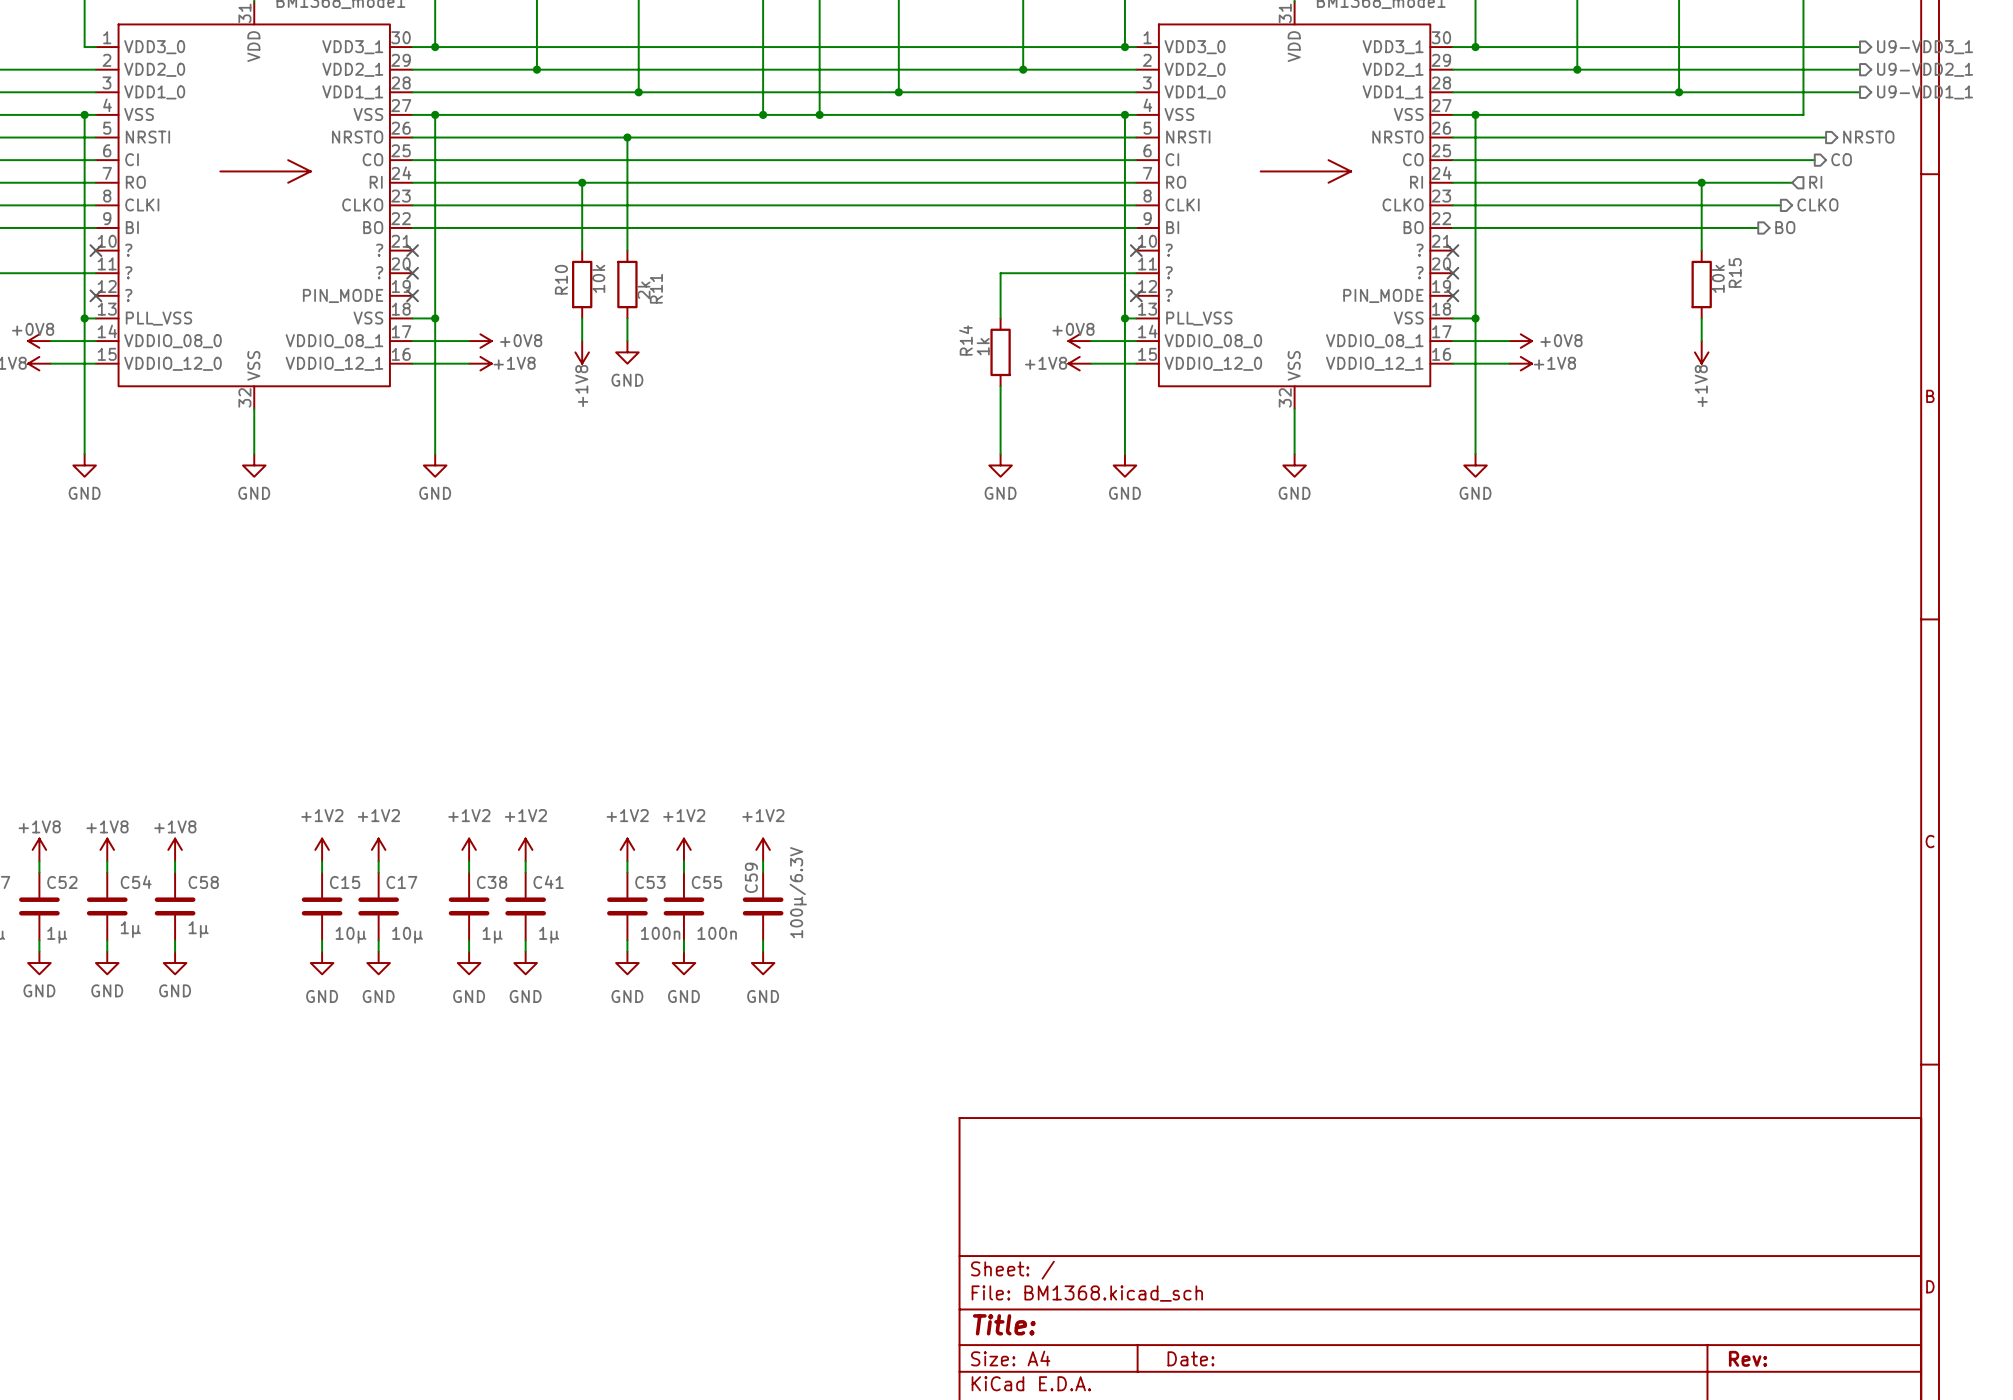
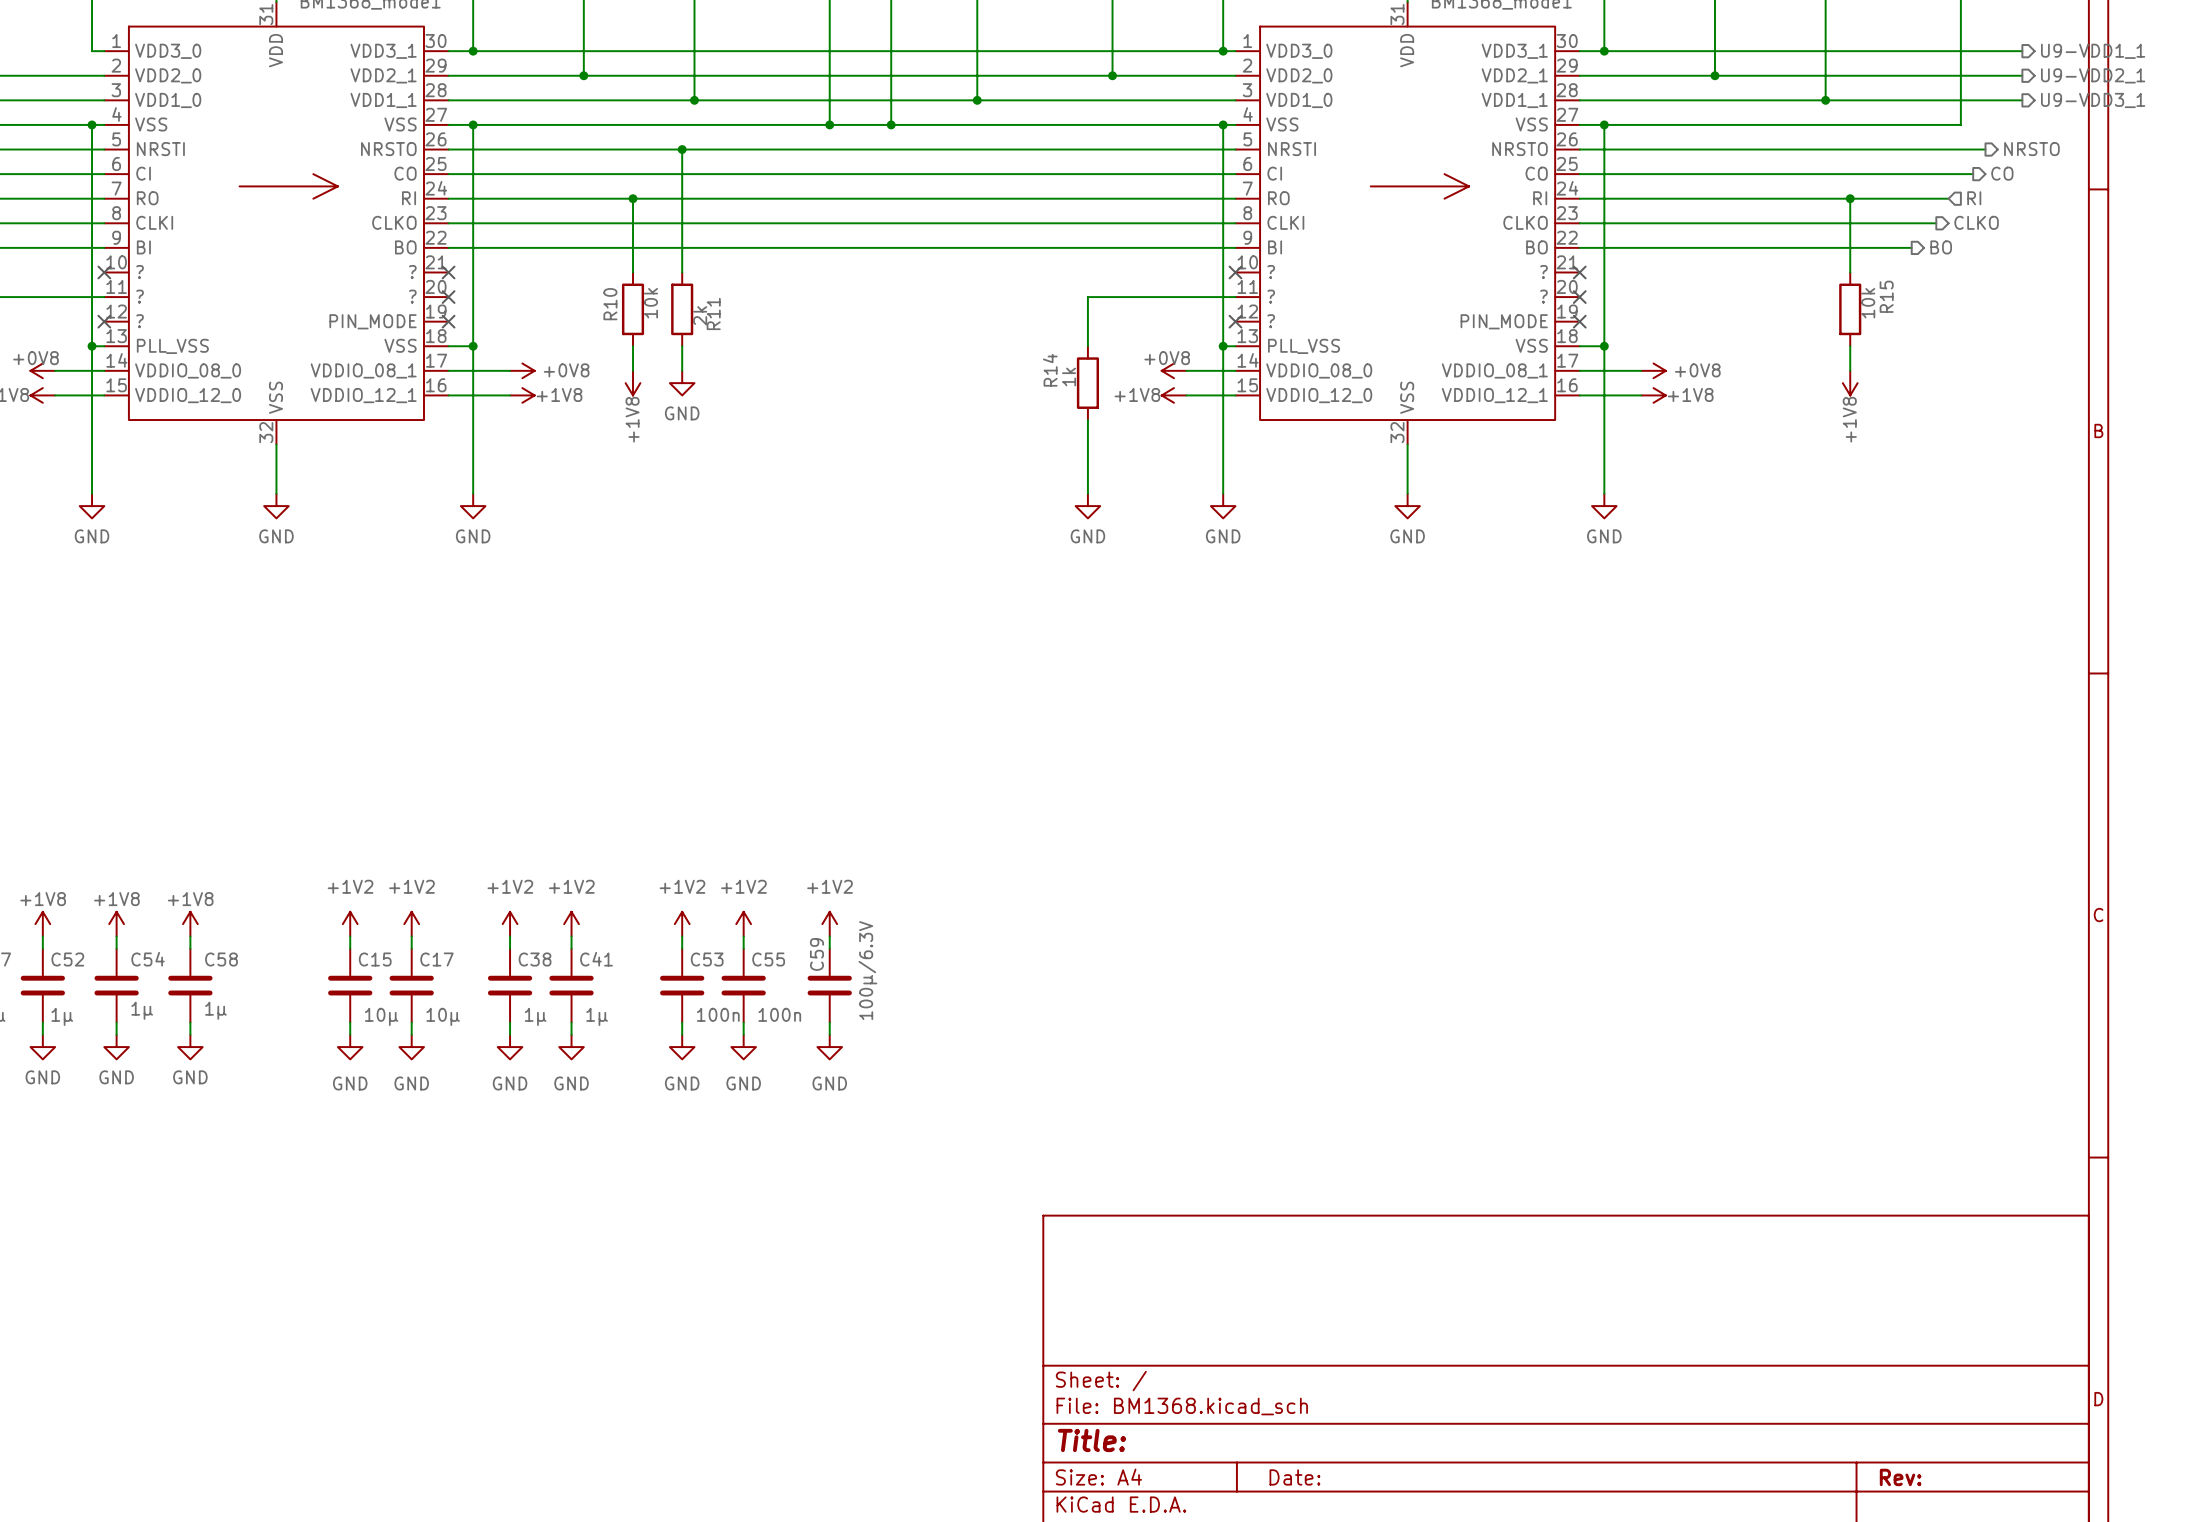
hierarchical label: U9-VDD3_1 (1925, 47) -> U9-VDD1_1 (2093, 51)
hierarchical label: U9-VDD1_1 (1925, 92) -> U9-VDD3_1 (2093, 100)

